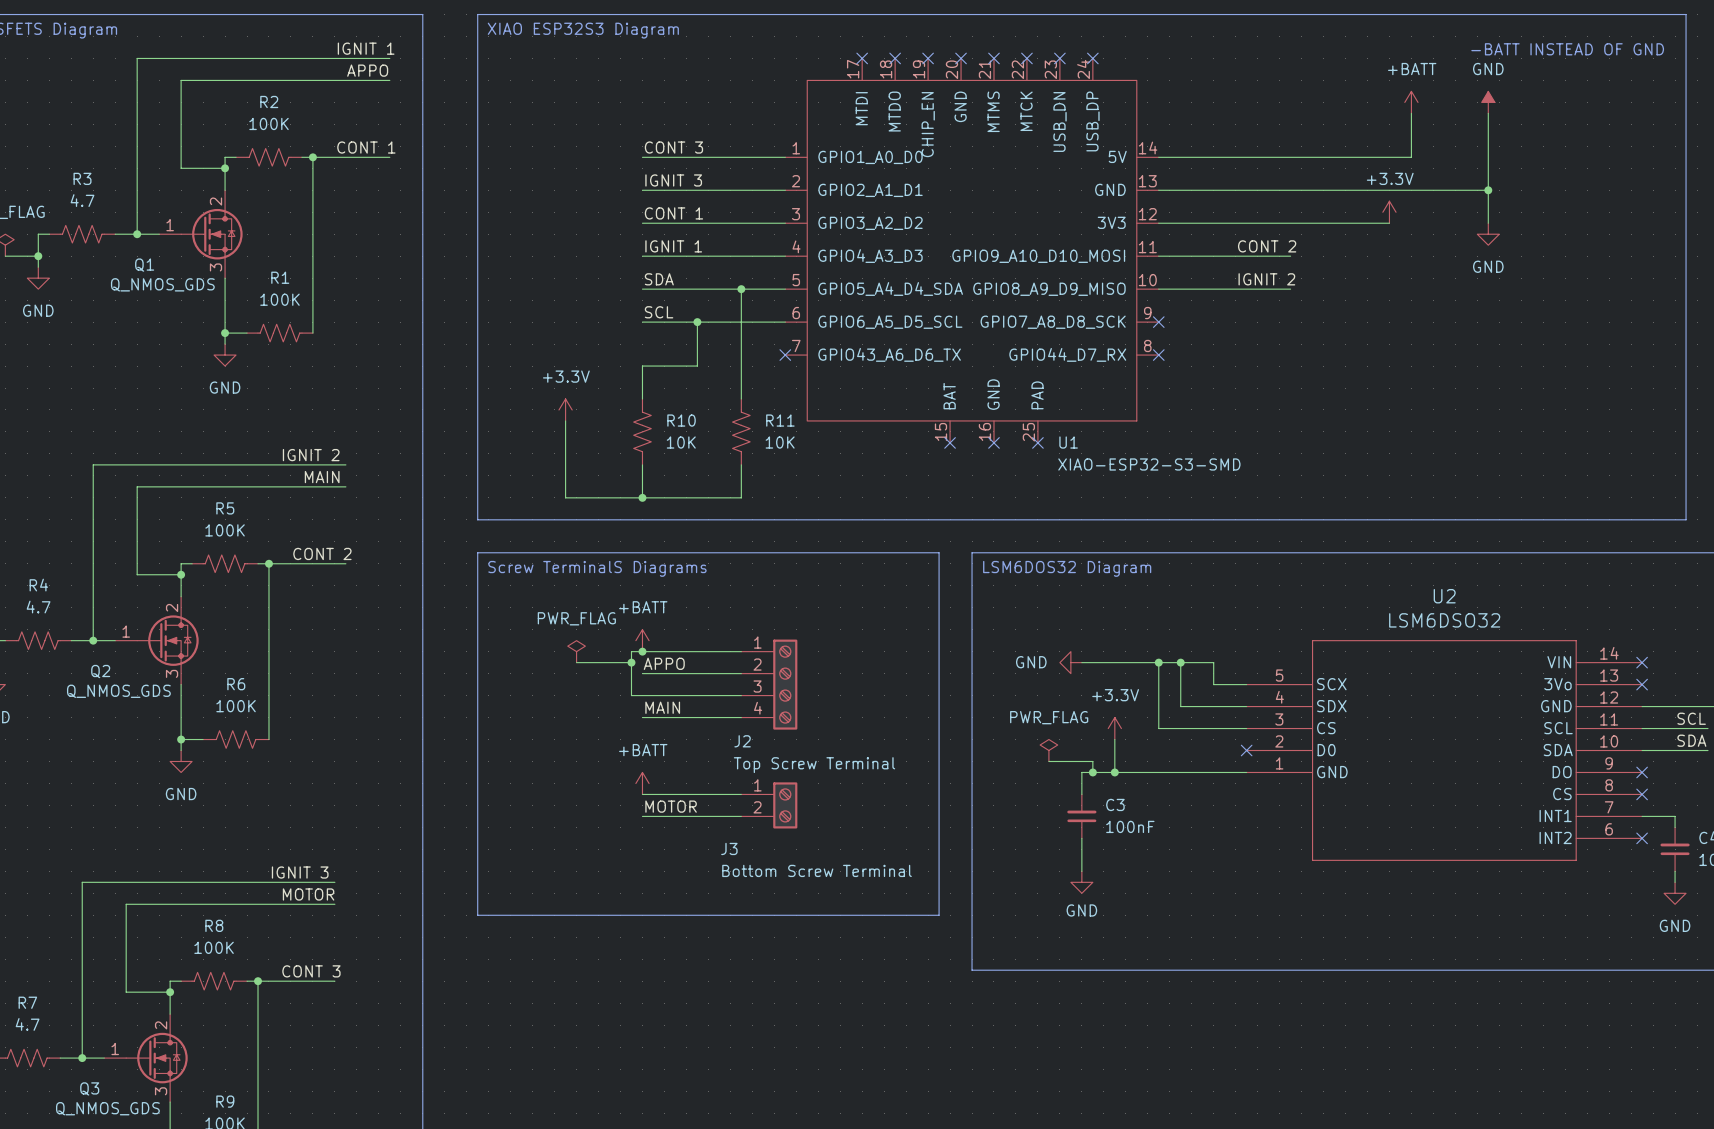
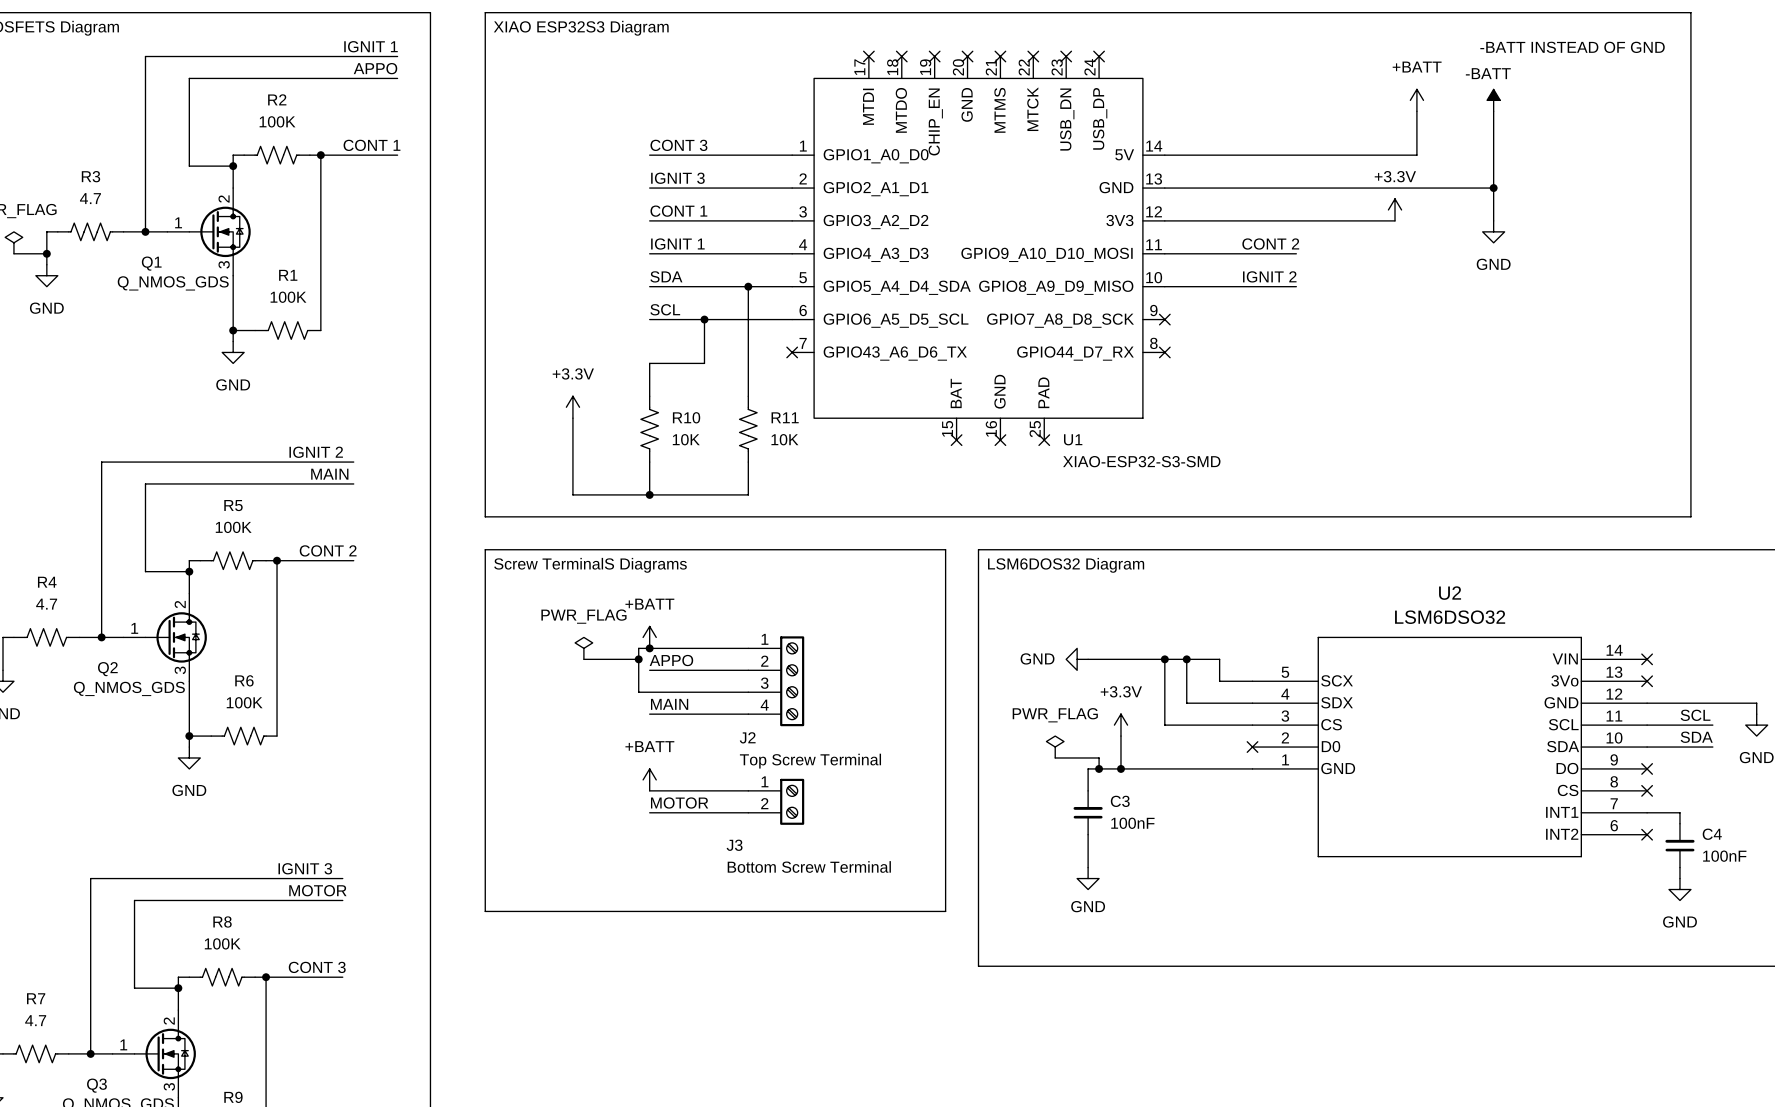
power symbol: GND (1488, 102) -> -BATT (1493, 100)

